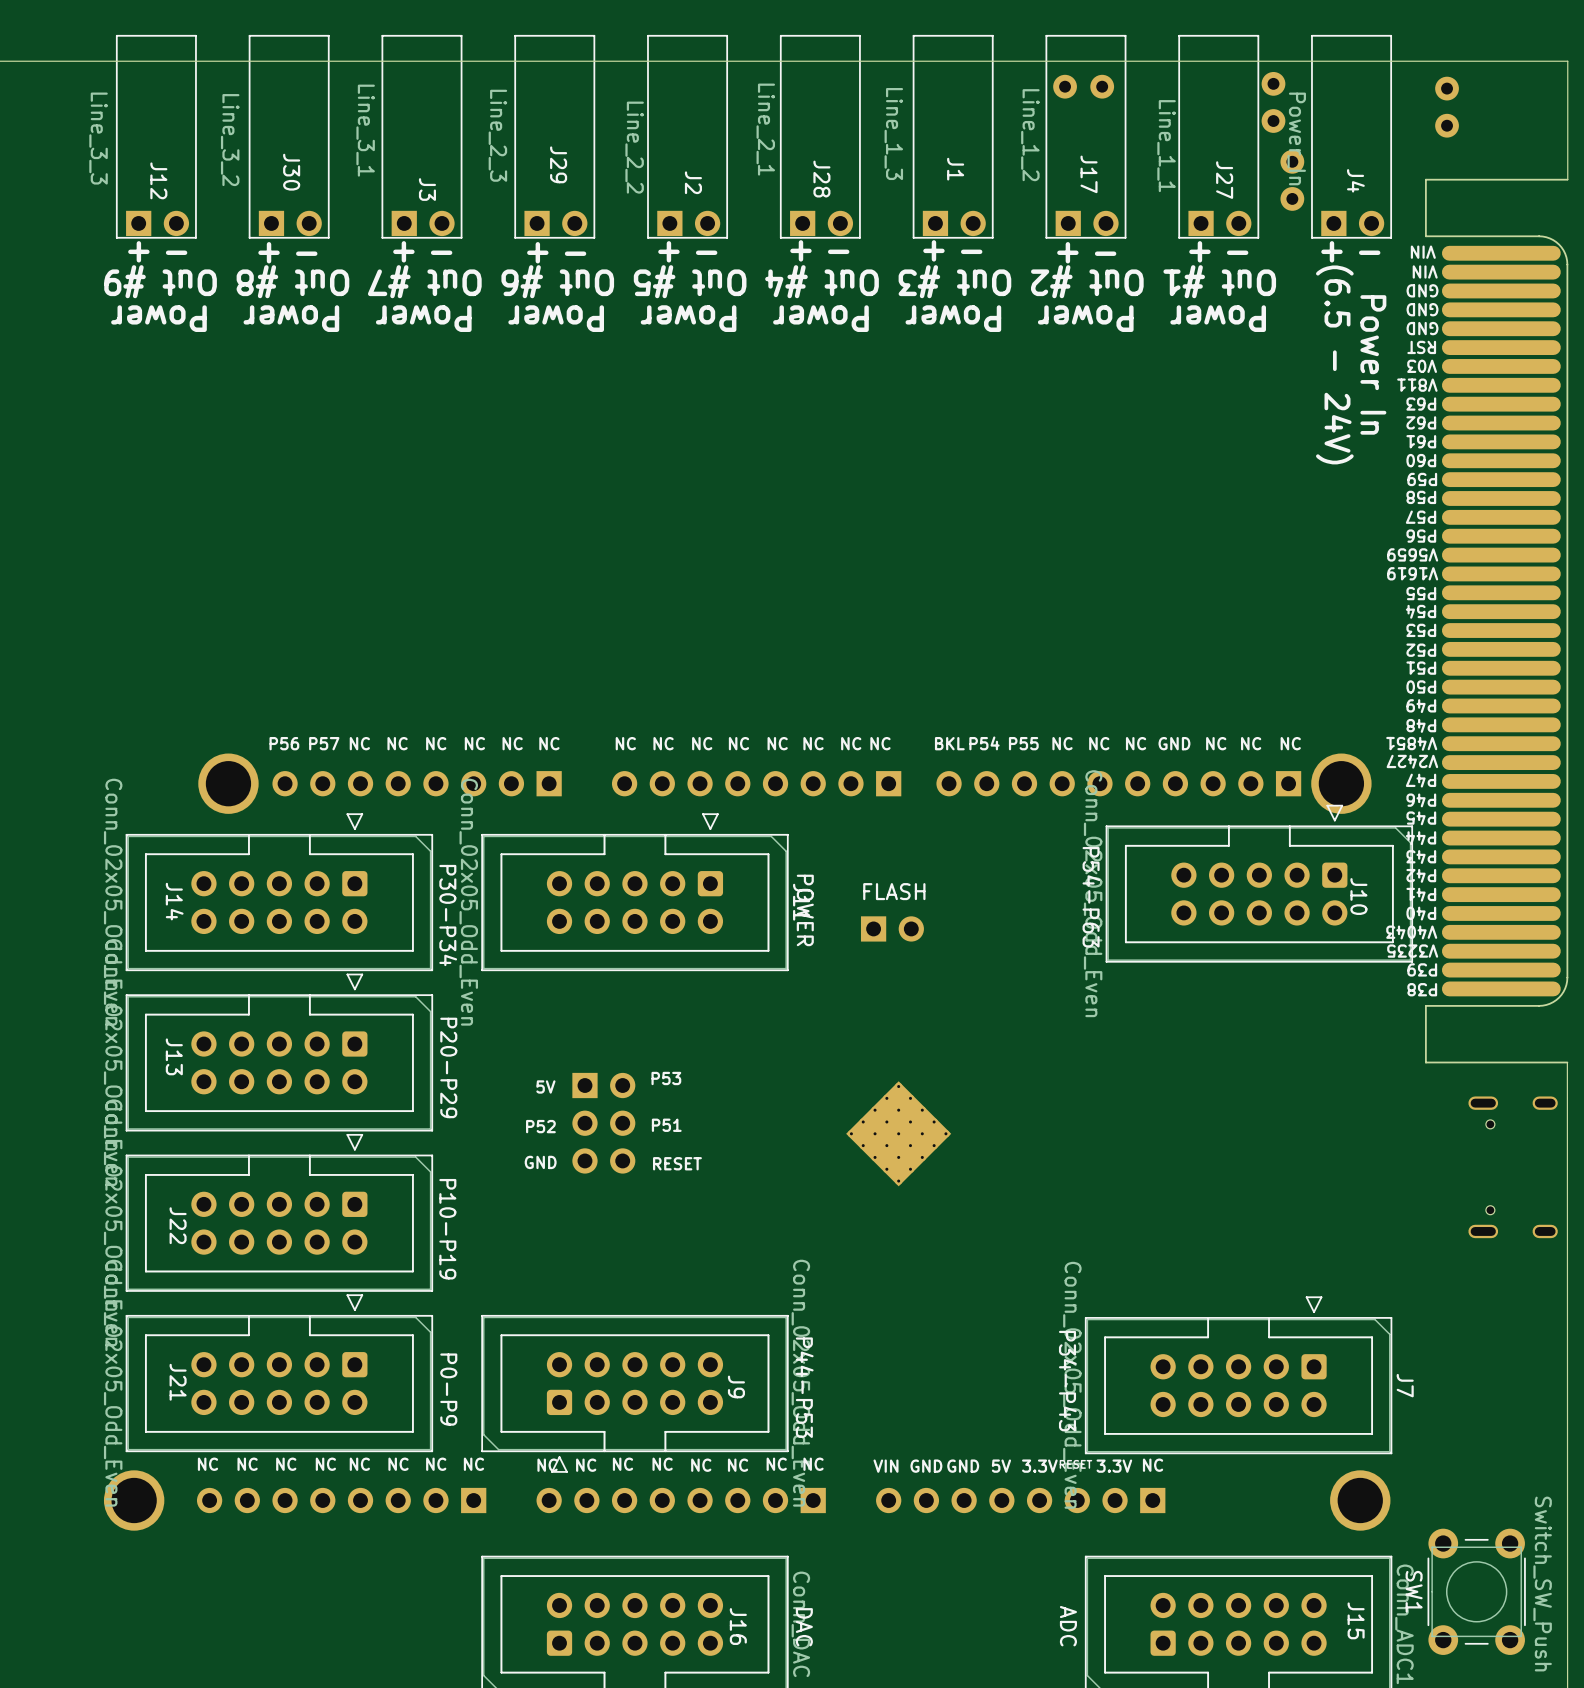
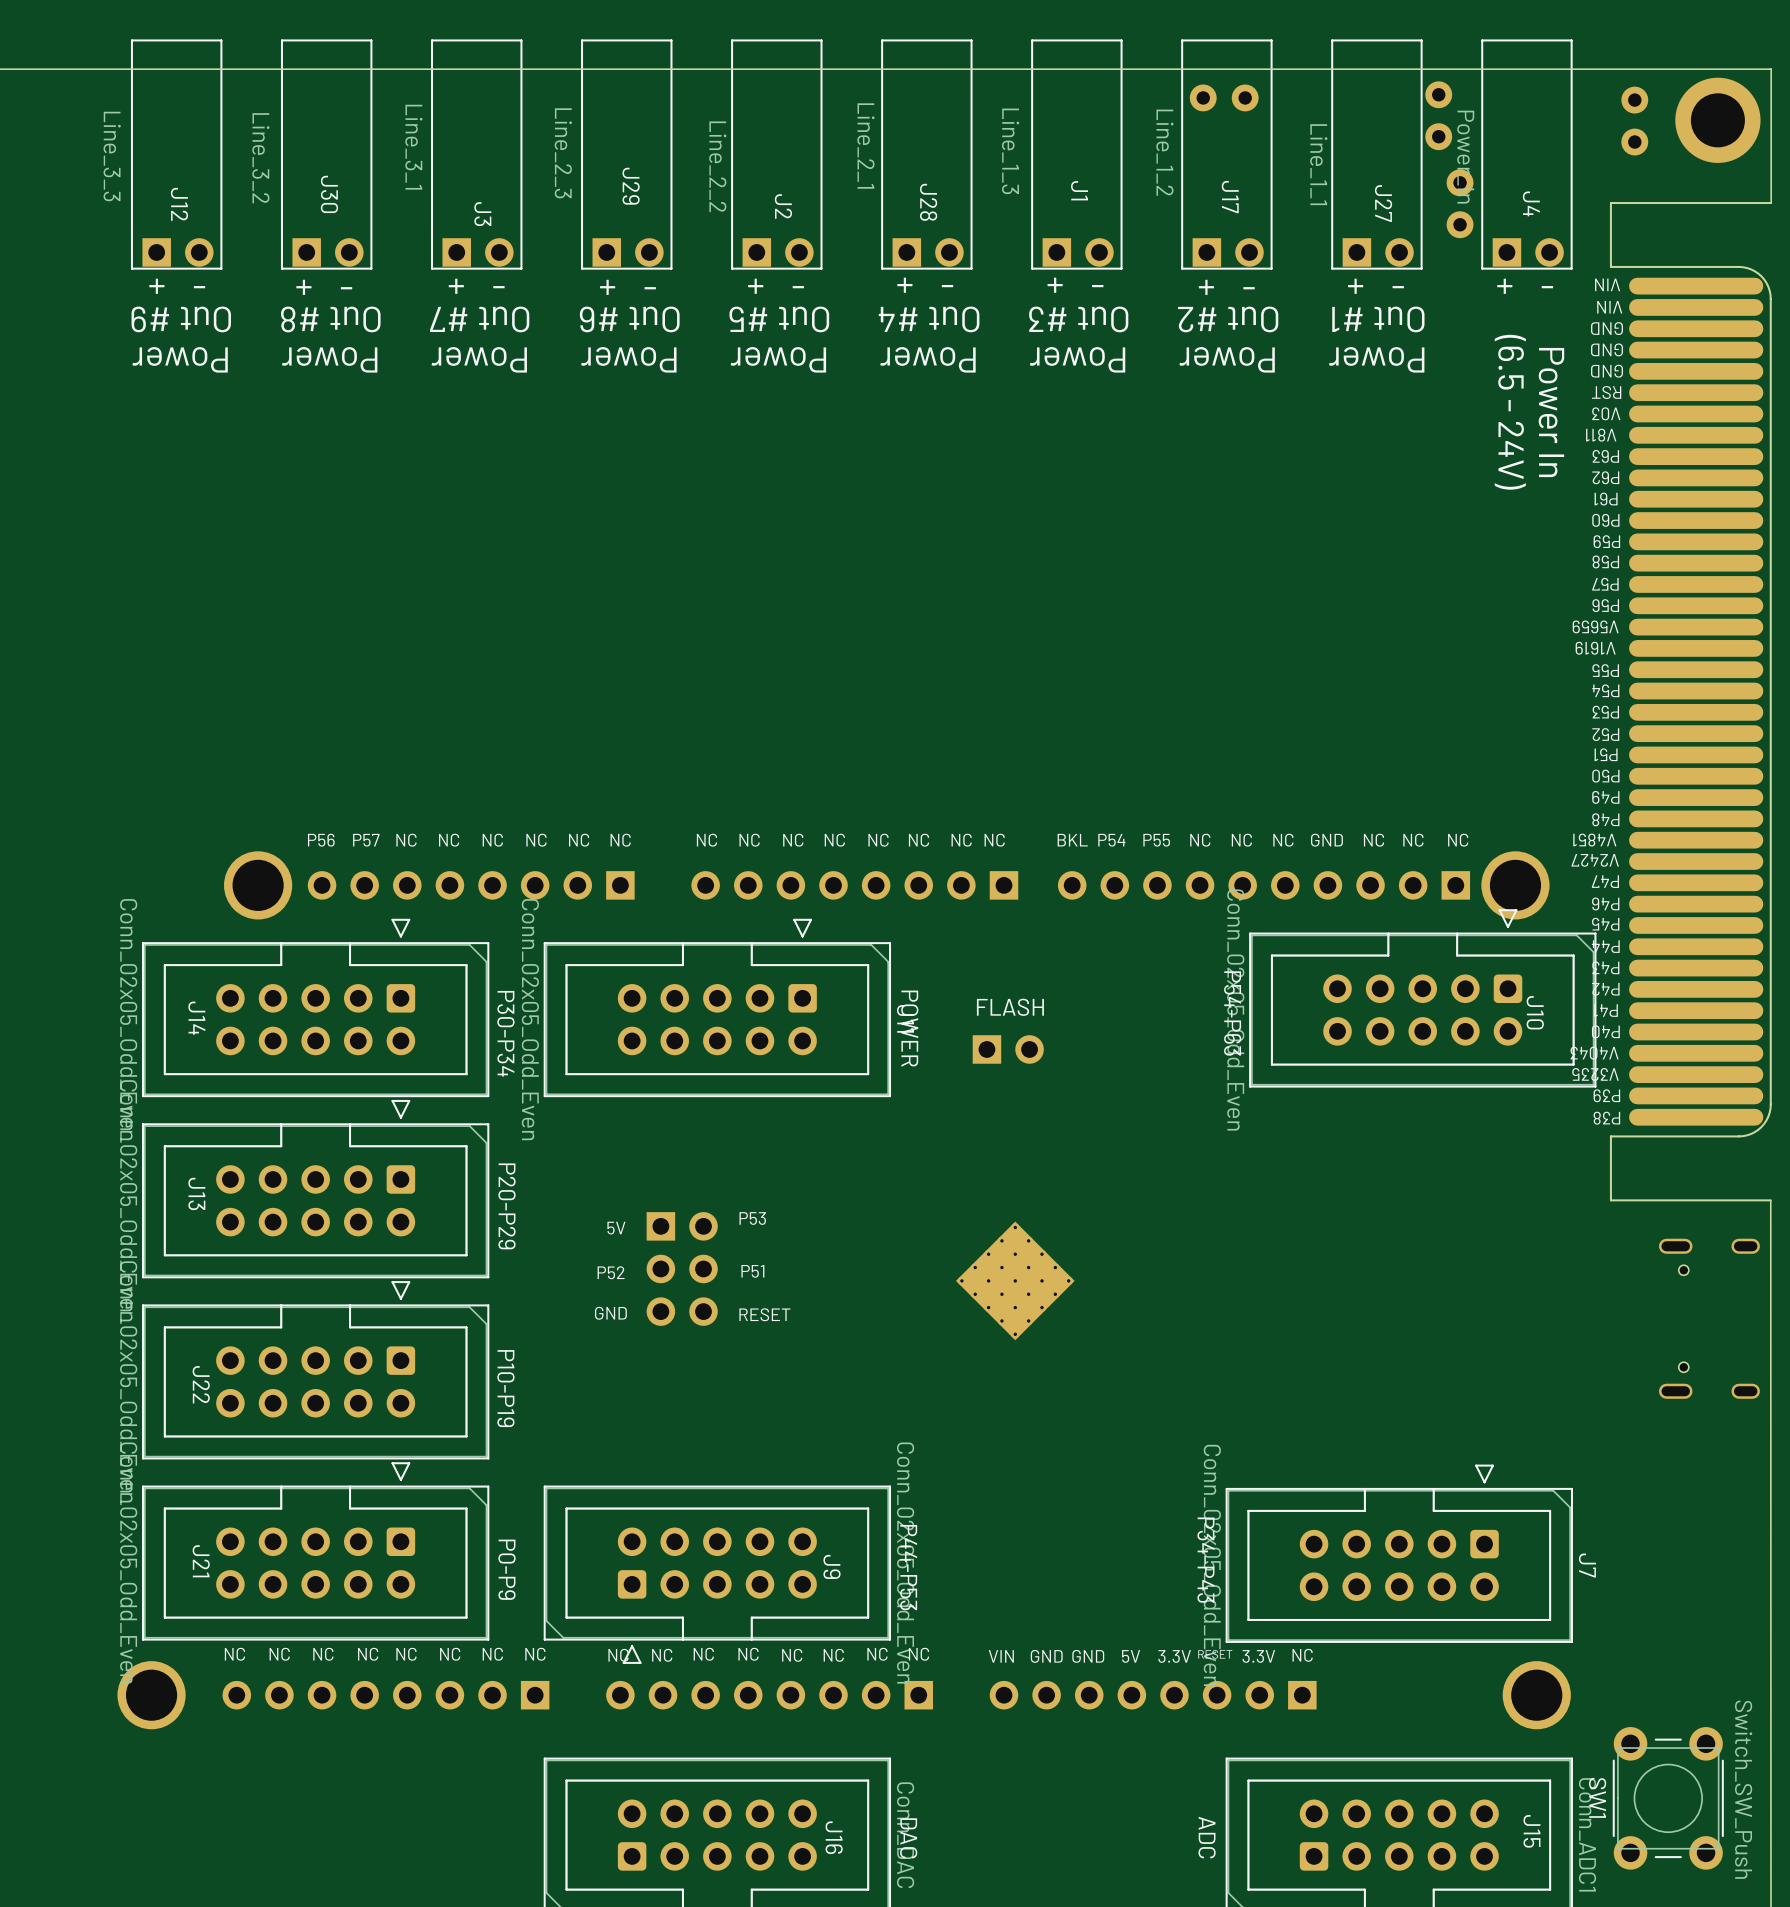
part: none -> (1717, 120)

